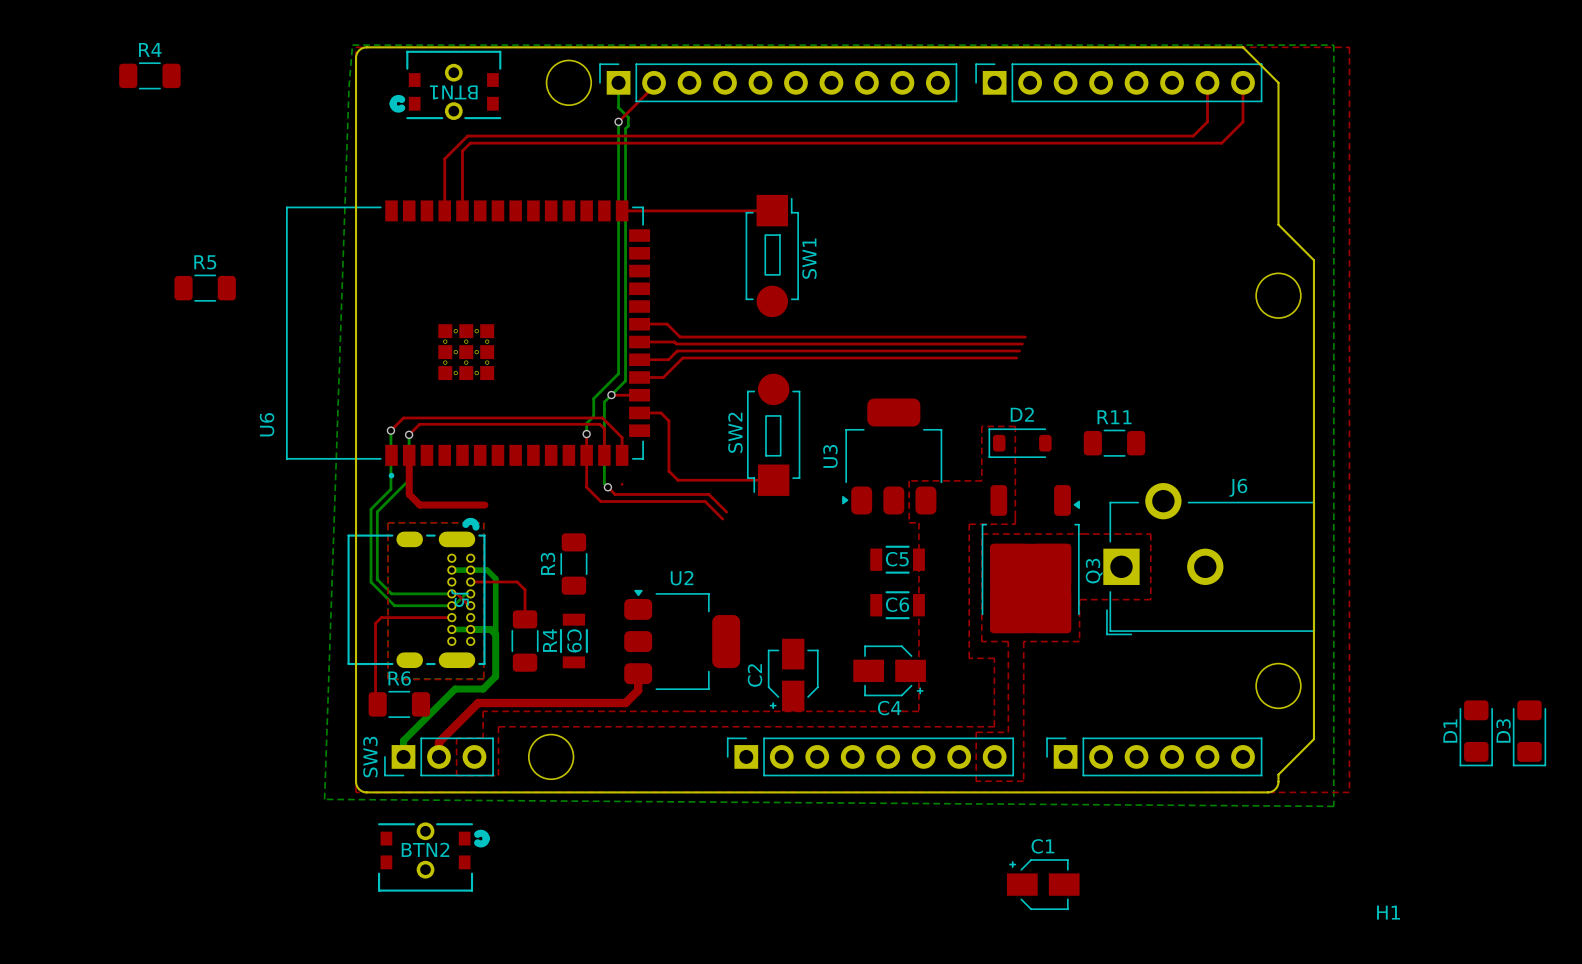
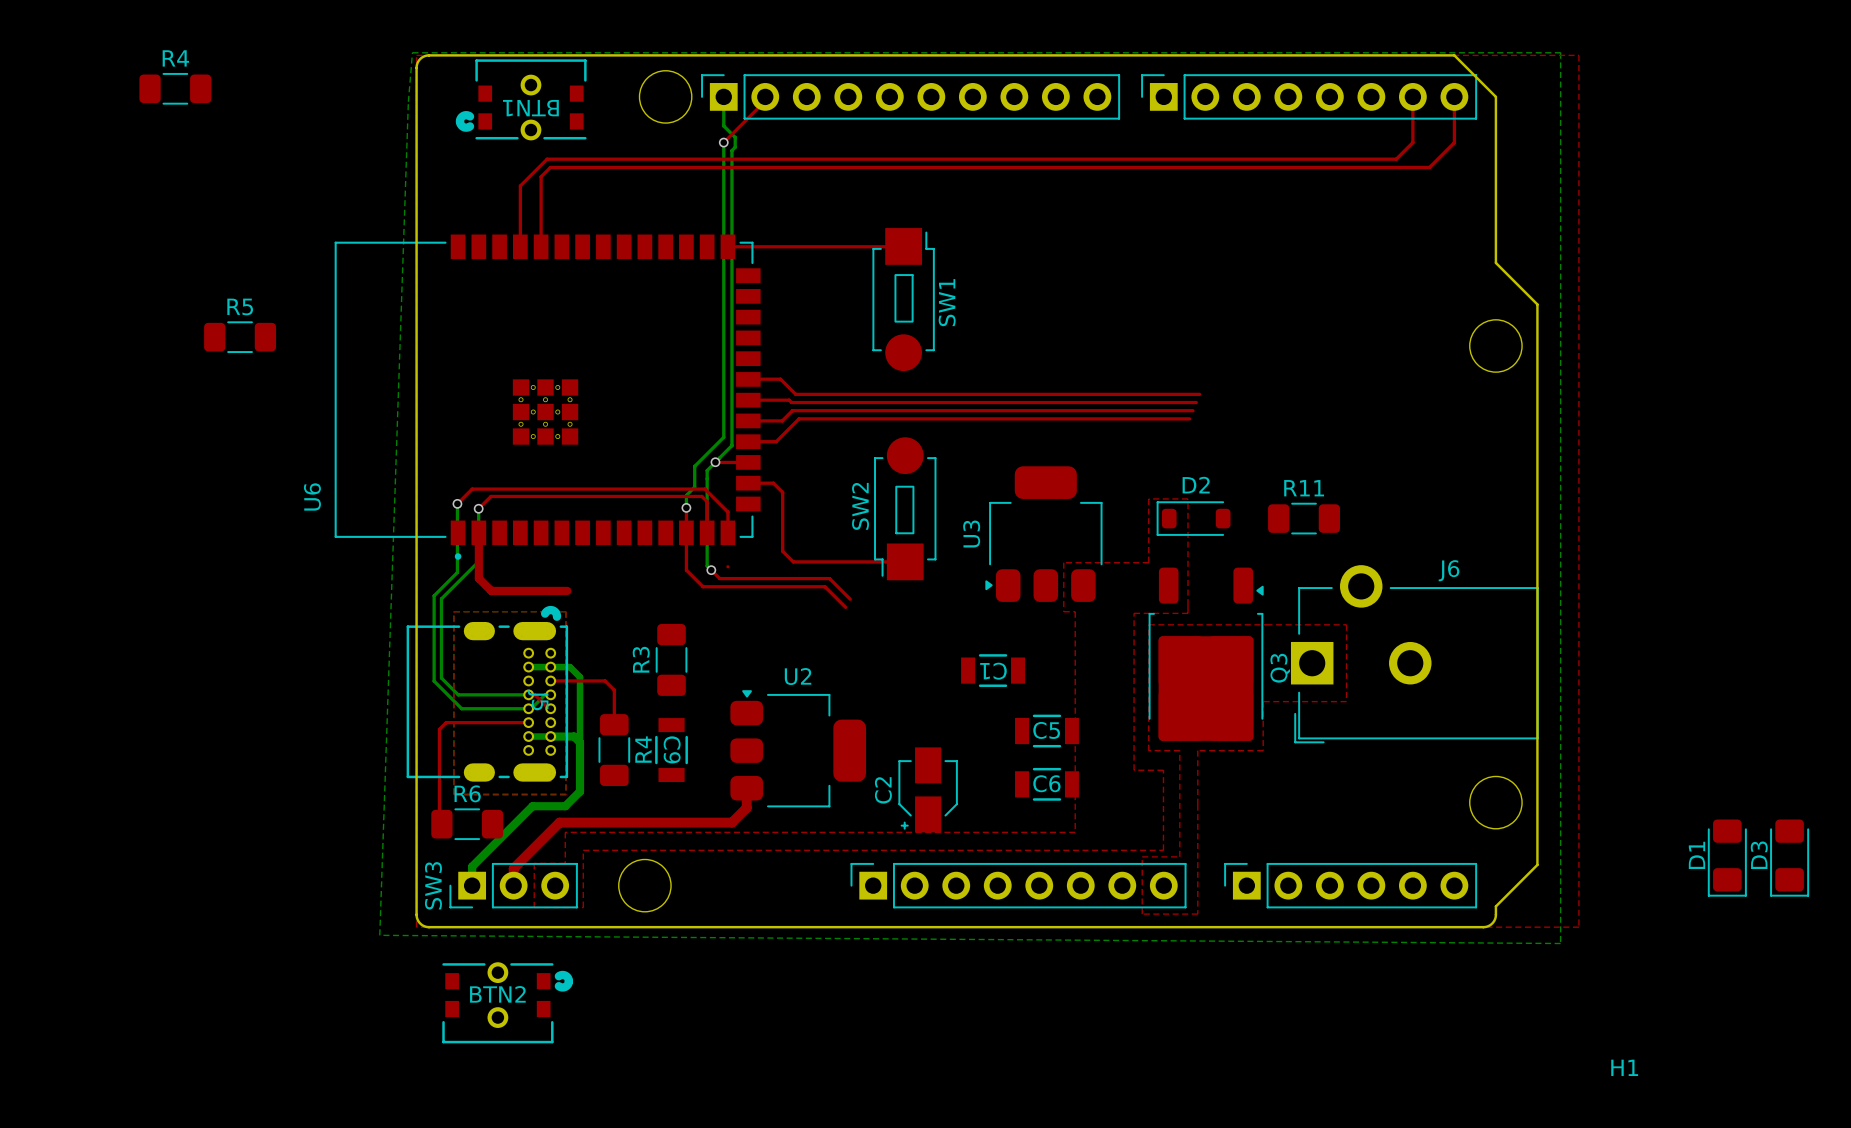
C5 position: (897, 559) -> (1046, 731)
C6 position: (897, 605) -> (1046, 784)
C4: (889, 670) -> none
C1 name position: C1 (1042, 846) -> C1 (993, 671)
C1 footprint: [1006, 859, 1080, 911] -> [961, 654, 1026, 687]

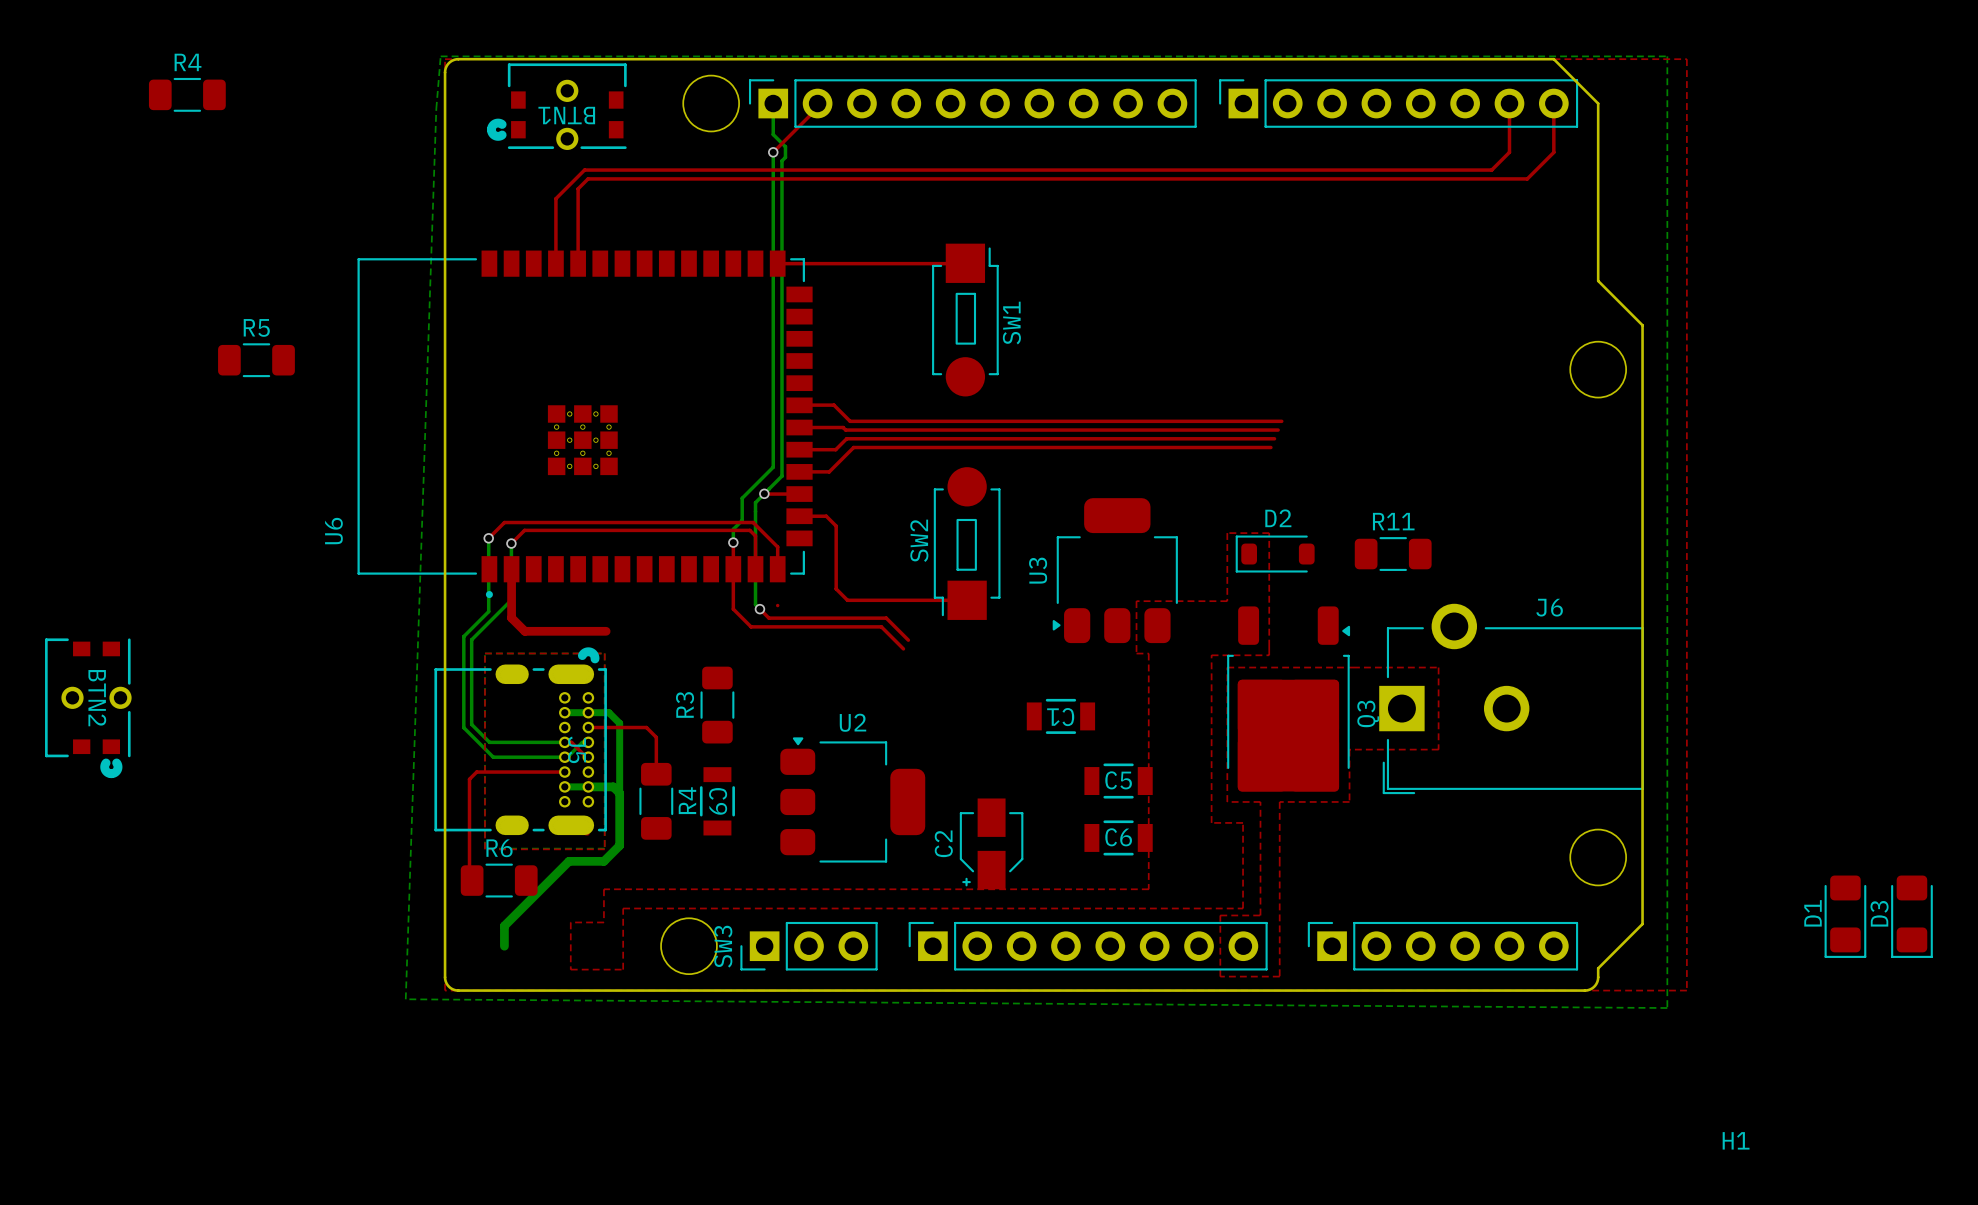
top track: (746, 788) (746, 807) (732, 822) (559, 822) (513, 868) (513, 885) -> none
SW3 position: (513, 885) -> (808, 946)
BTN2 rotation: 0° (507, 1002) -> 90° clockwise (88, 708)
BTN2 position: (507, 1002) -> (88, 708)

